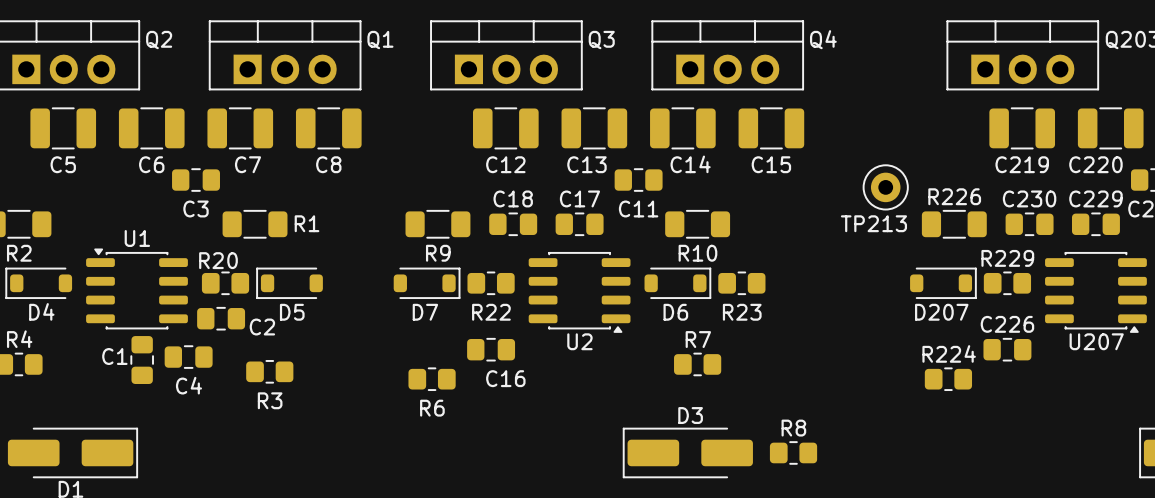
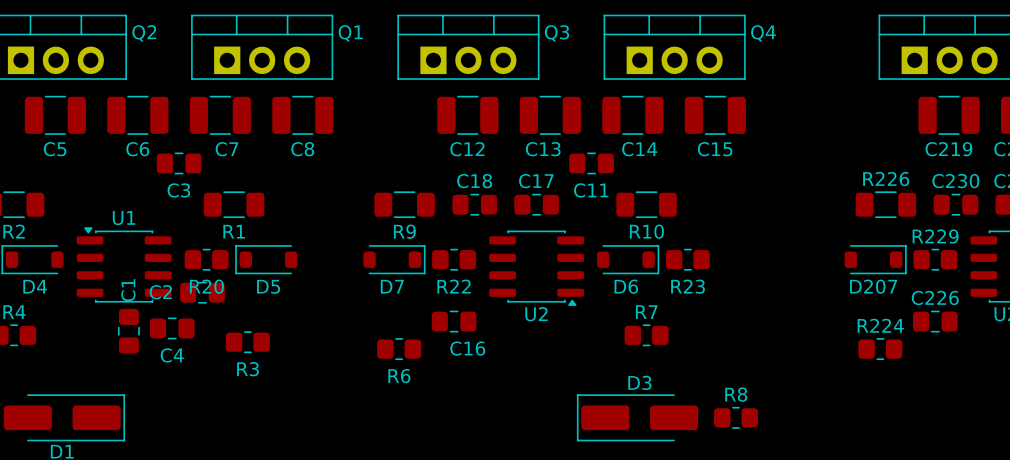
TP213: (885, 187) -> none
R1 name position: R1 (307, 223) -> R1 (234, 231)
R20 name position: R20 (218, 260) -> R20 (206, 286)
C2 name position: C2 (262, 327) -> C2 (160, 292)
C1 name rotation: 0° (114, 356) -> 90° counterclockwise (128, 290)
C1 name position: C1 (114, 356) -> C1 (128, 290)

